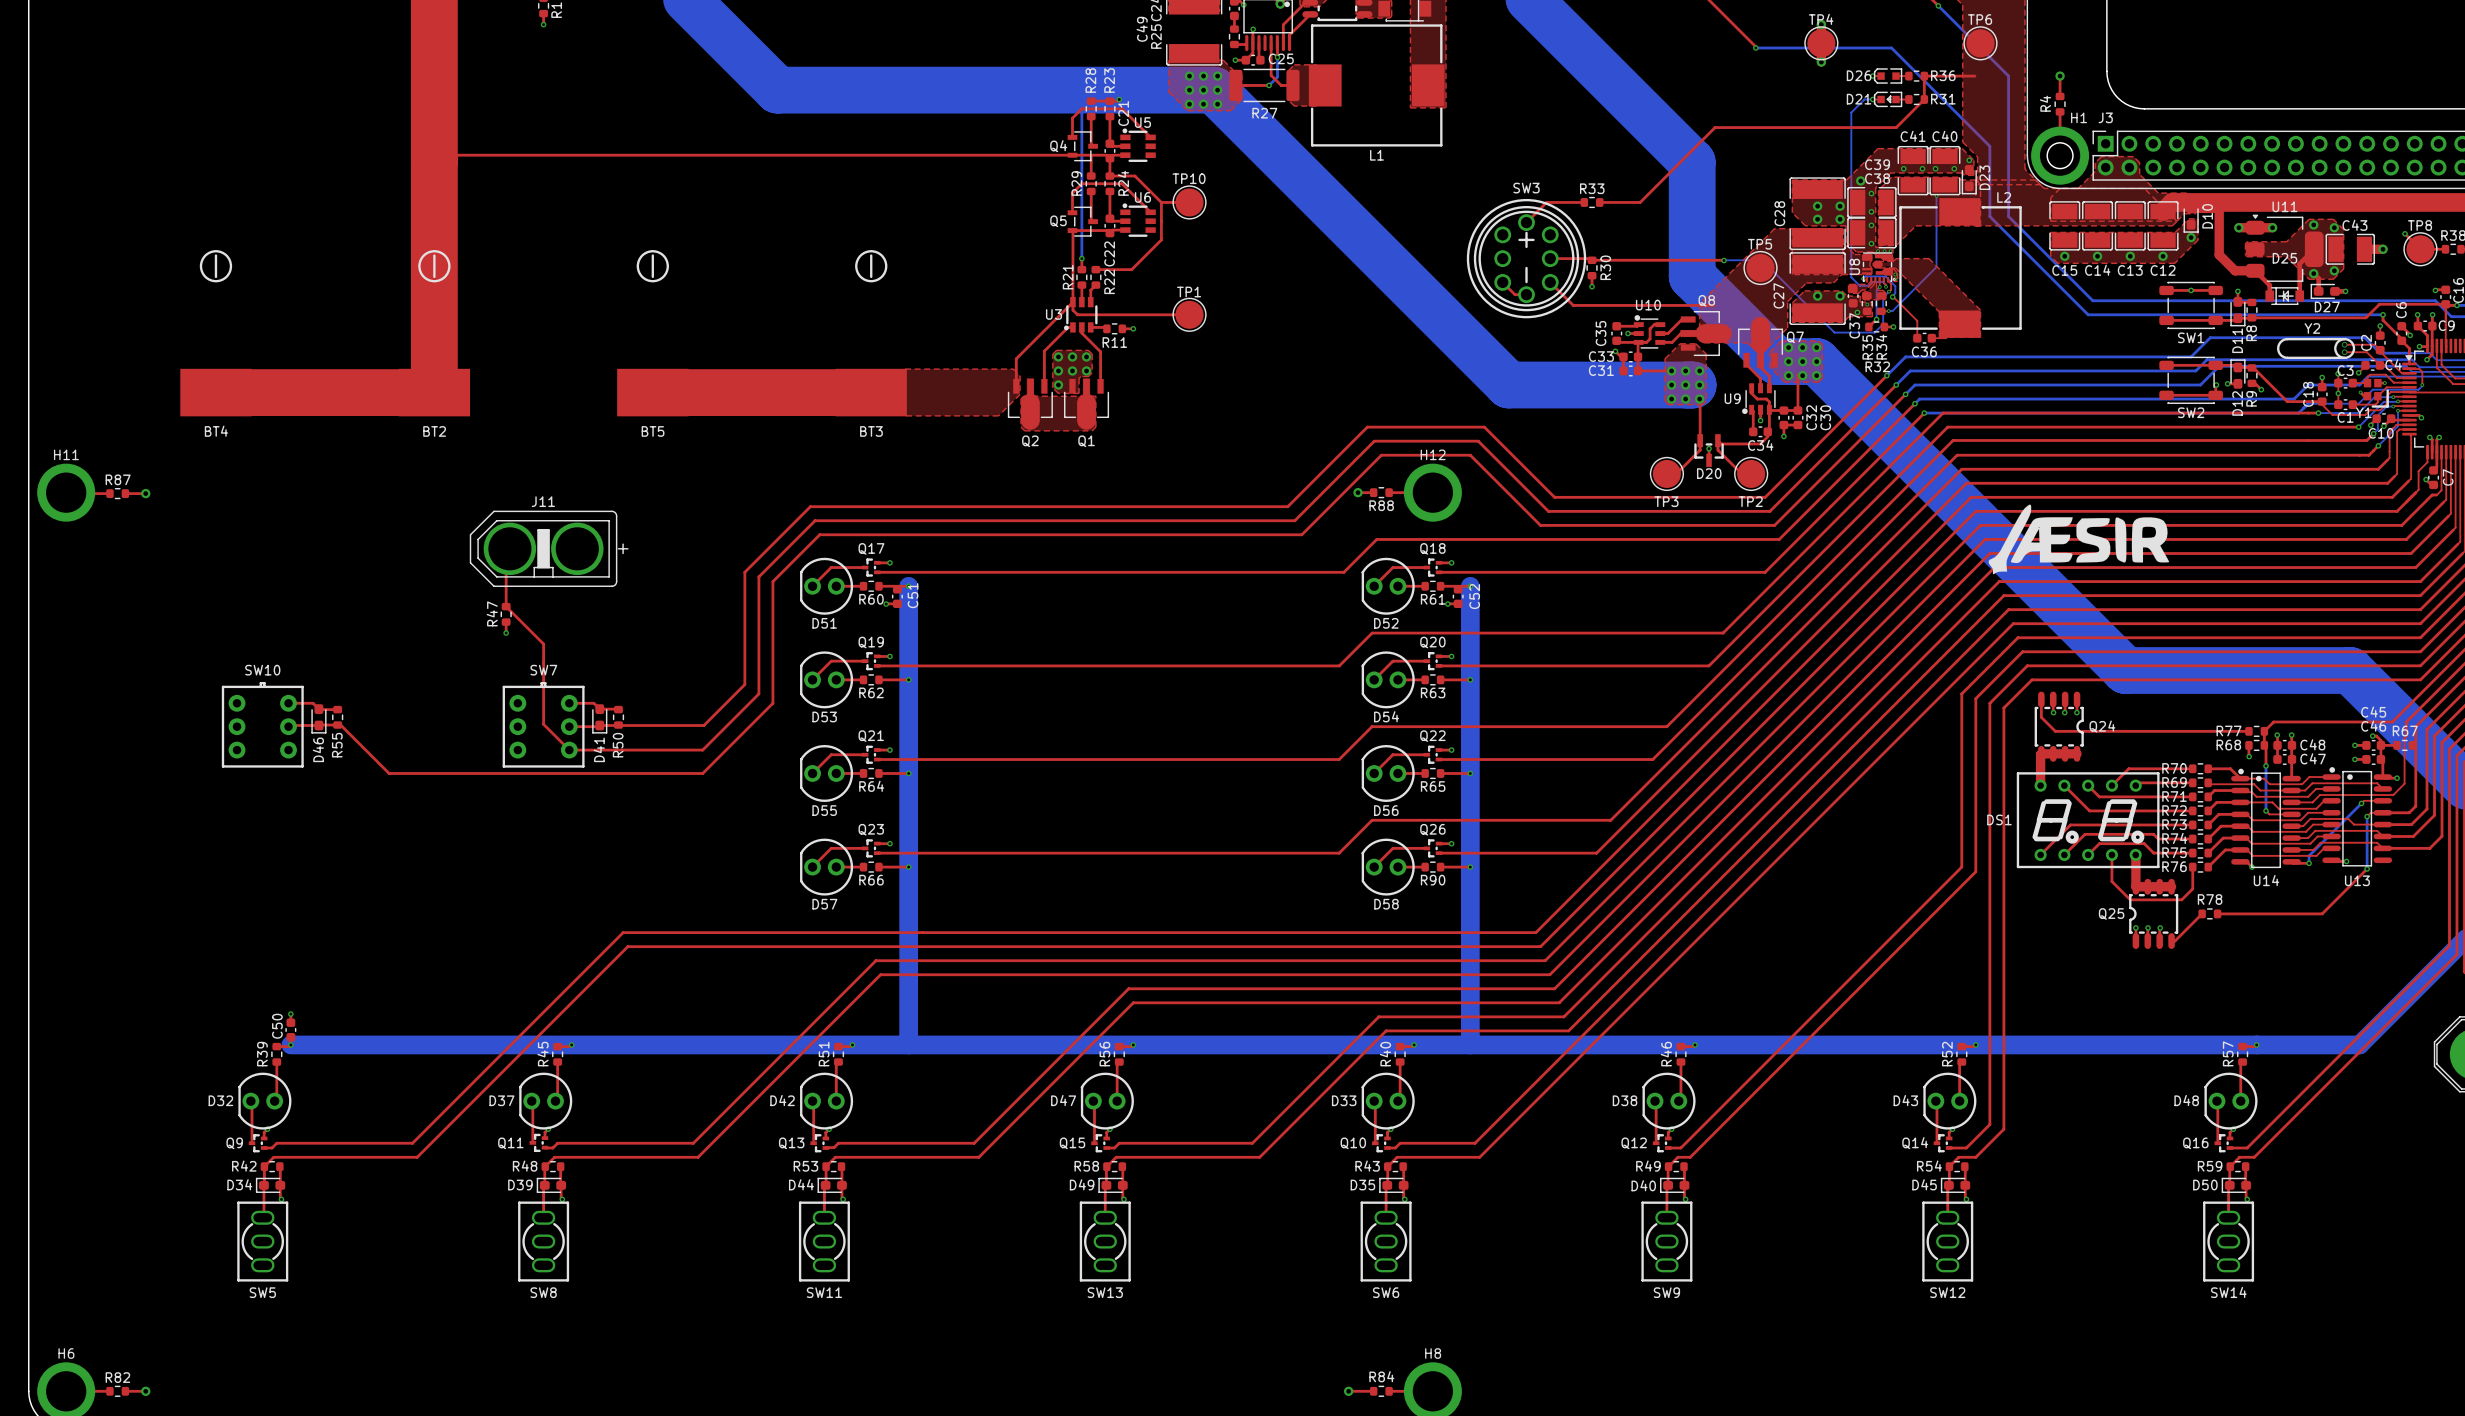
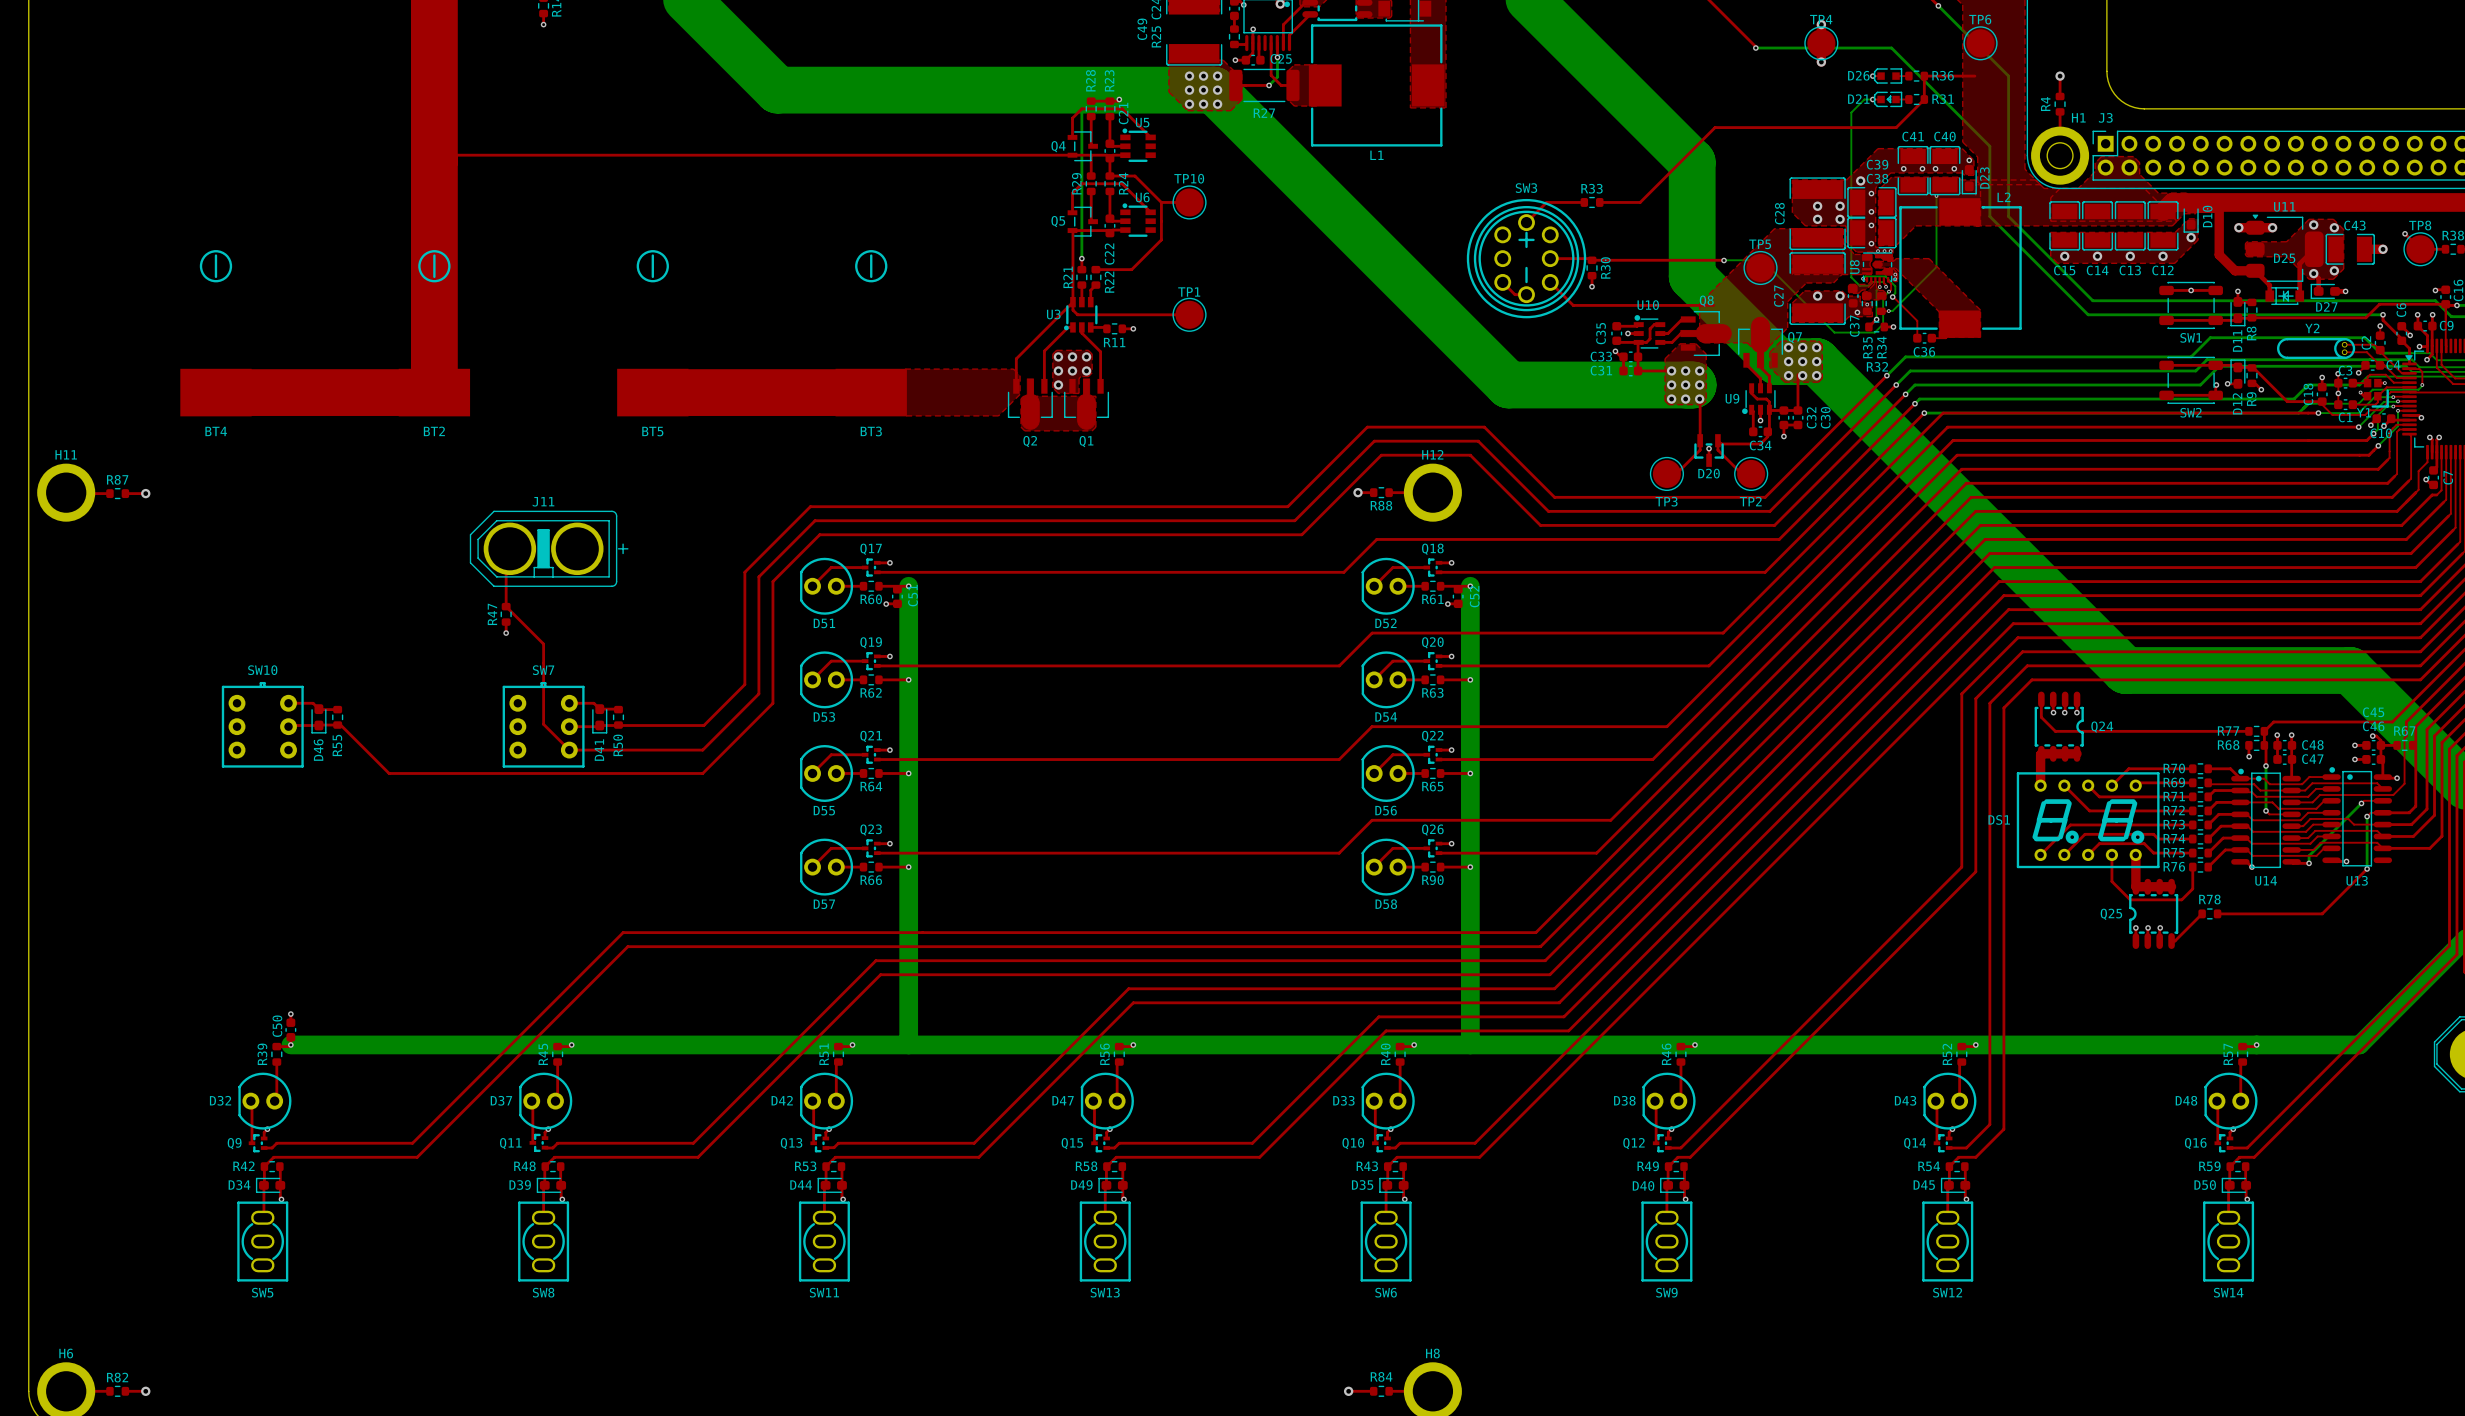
drawing: [1988, 504, 2170, 575] -> none

